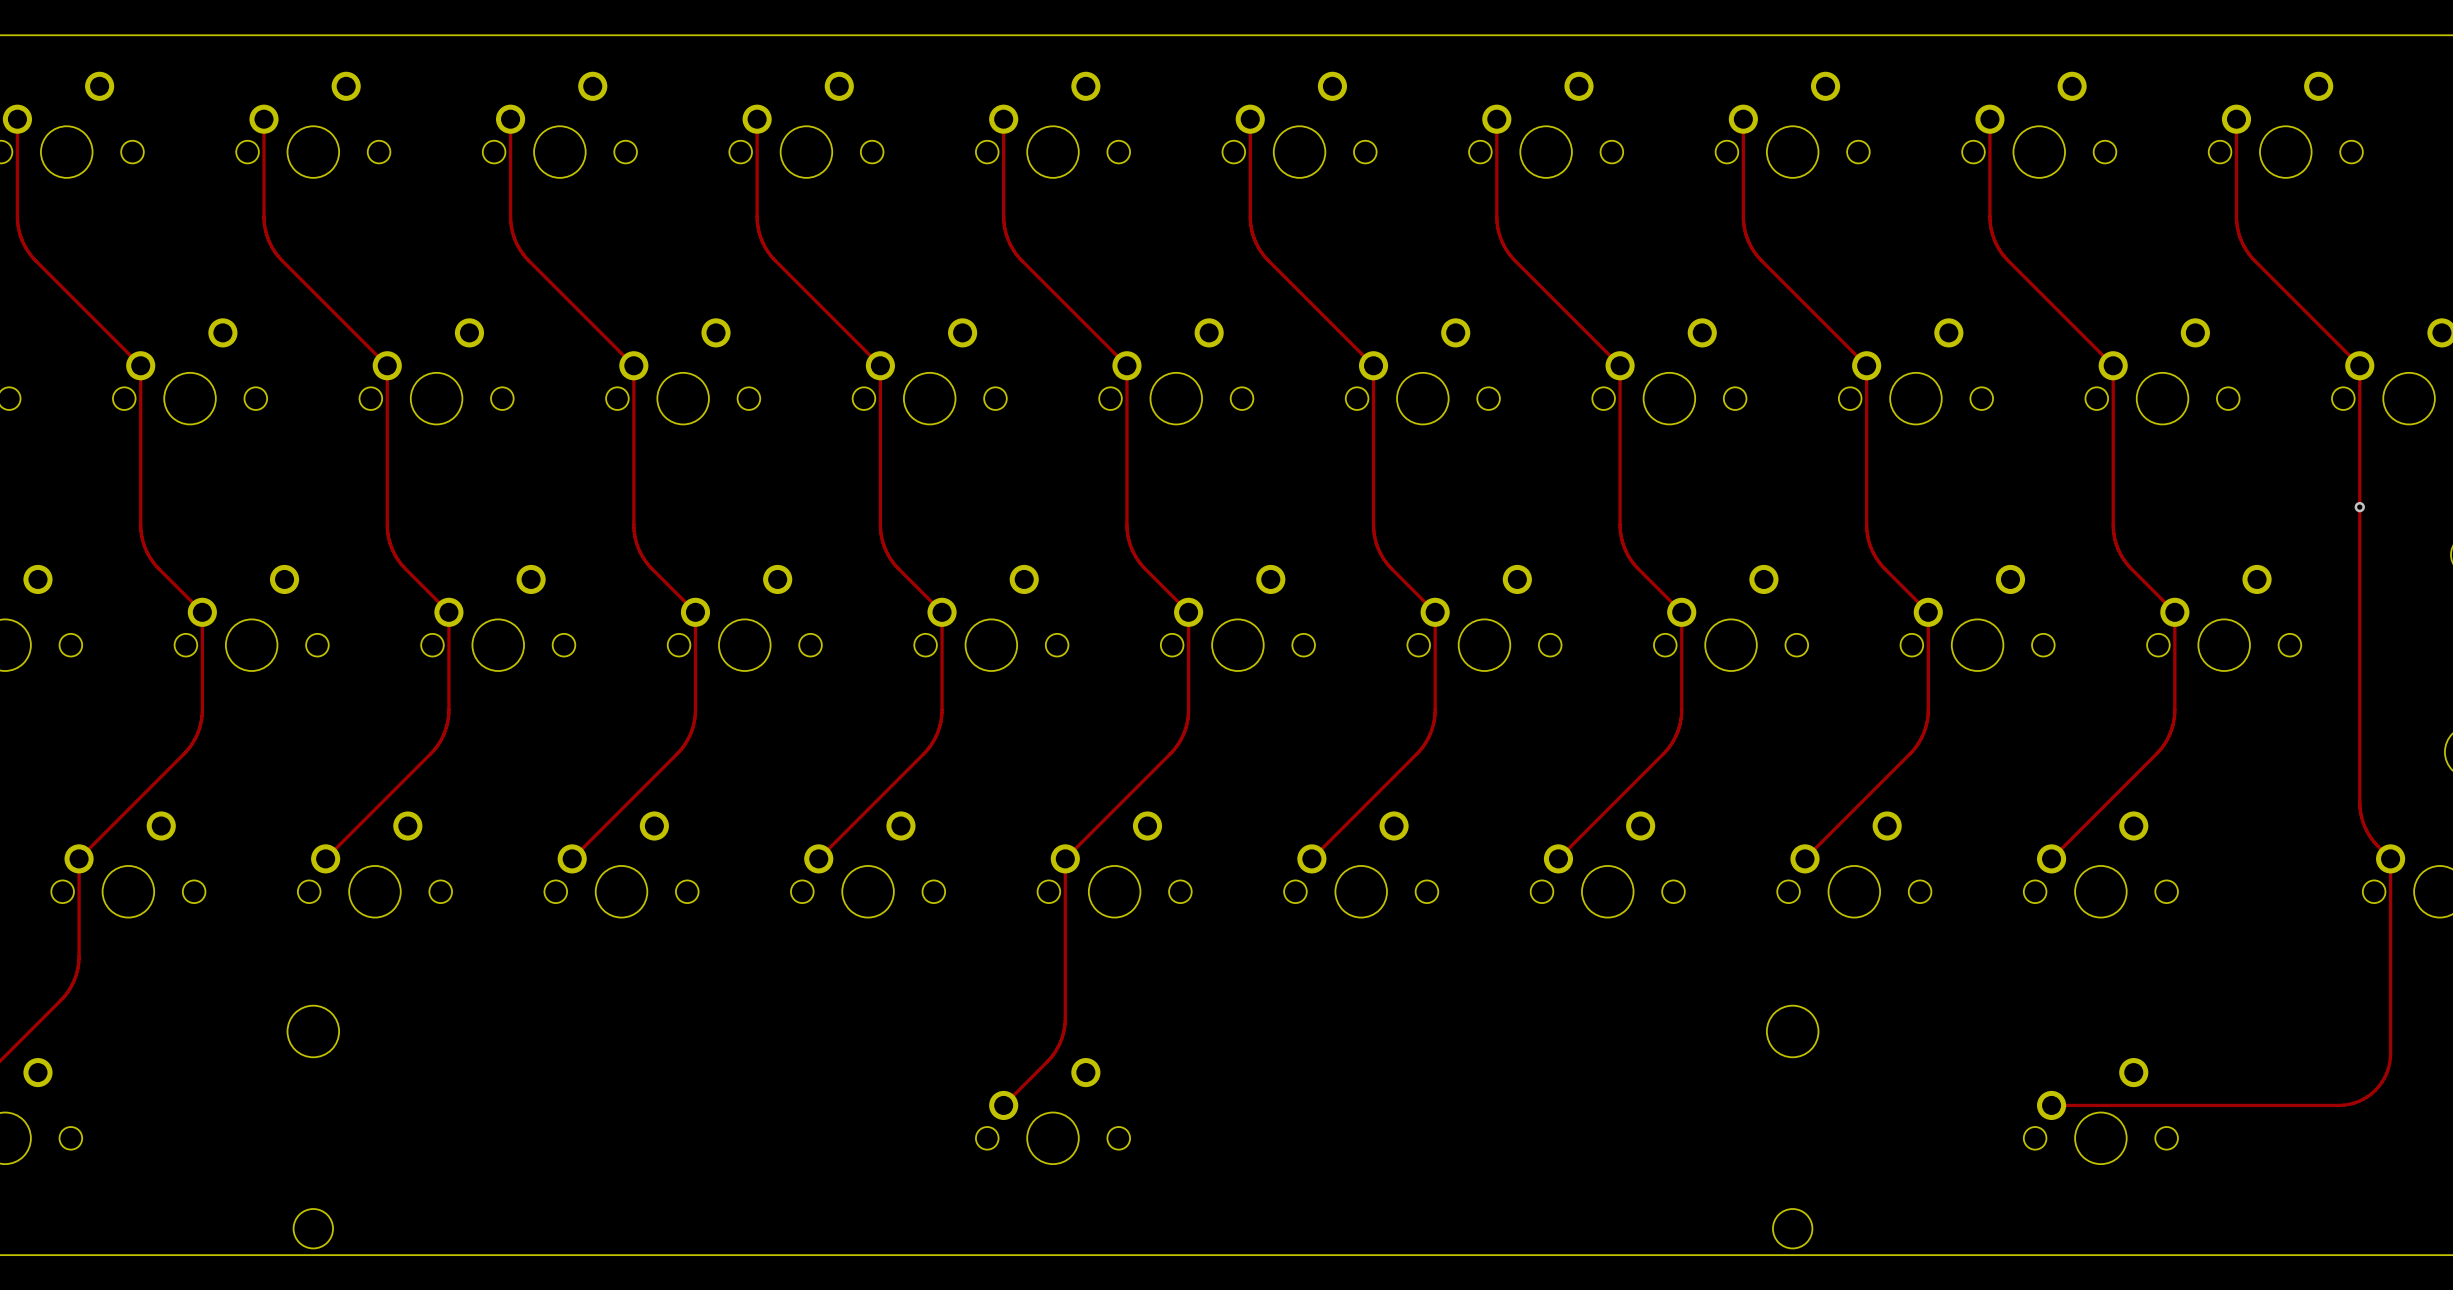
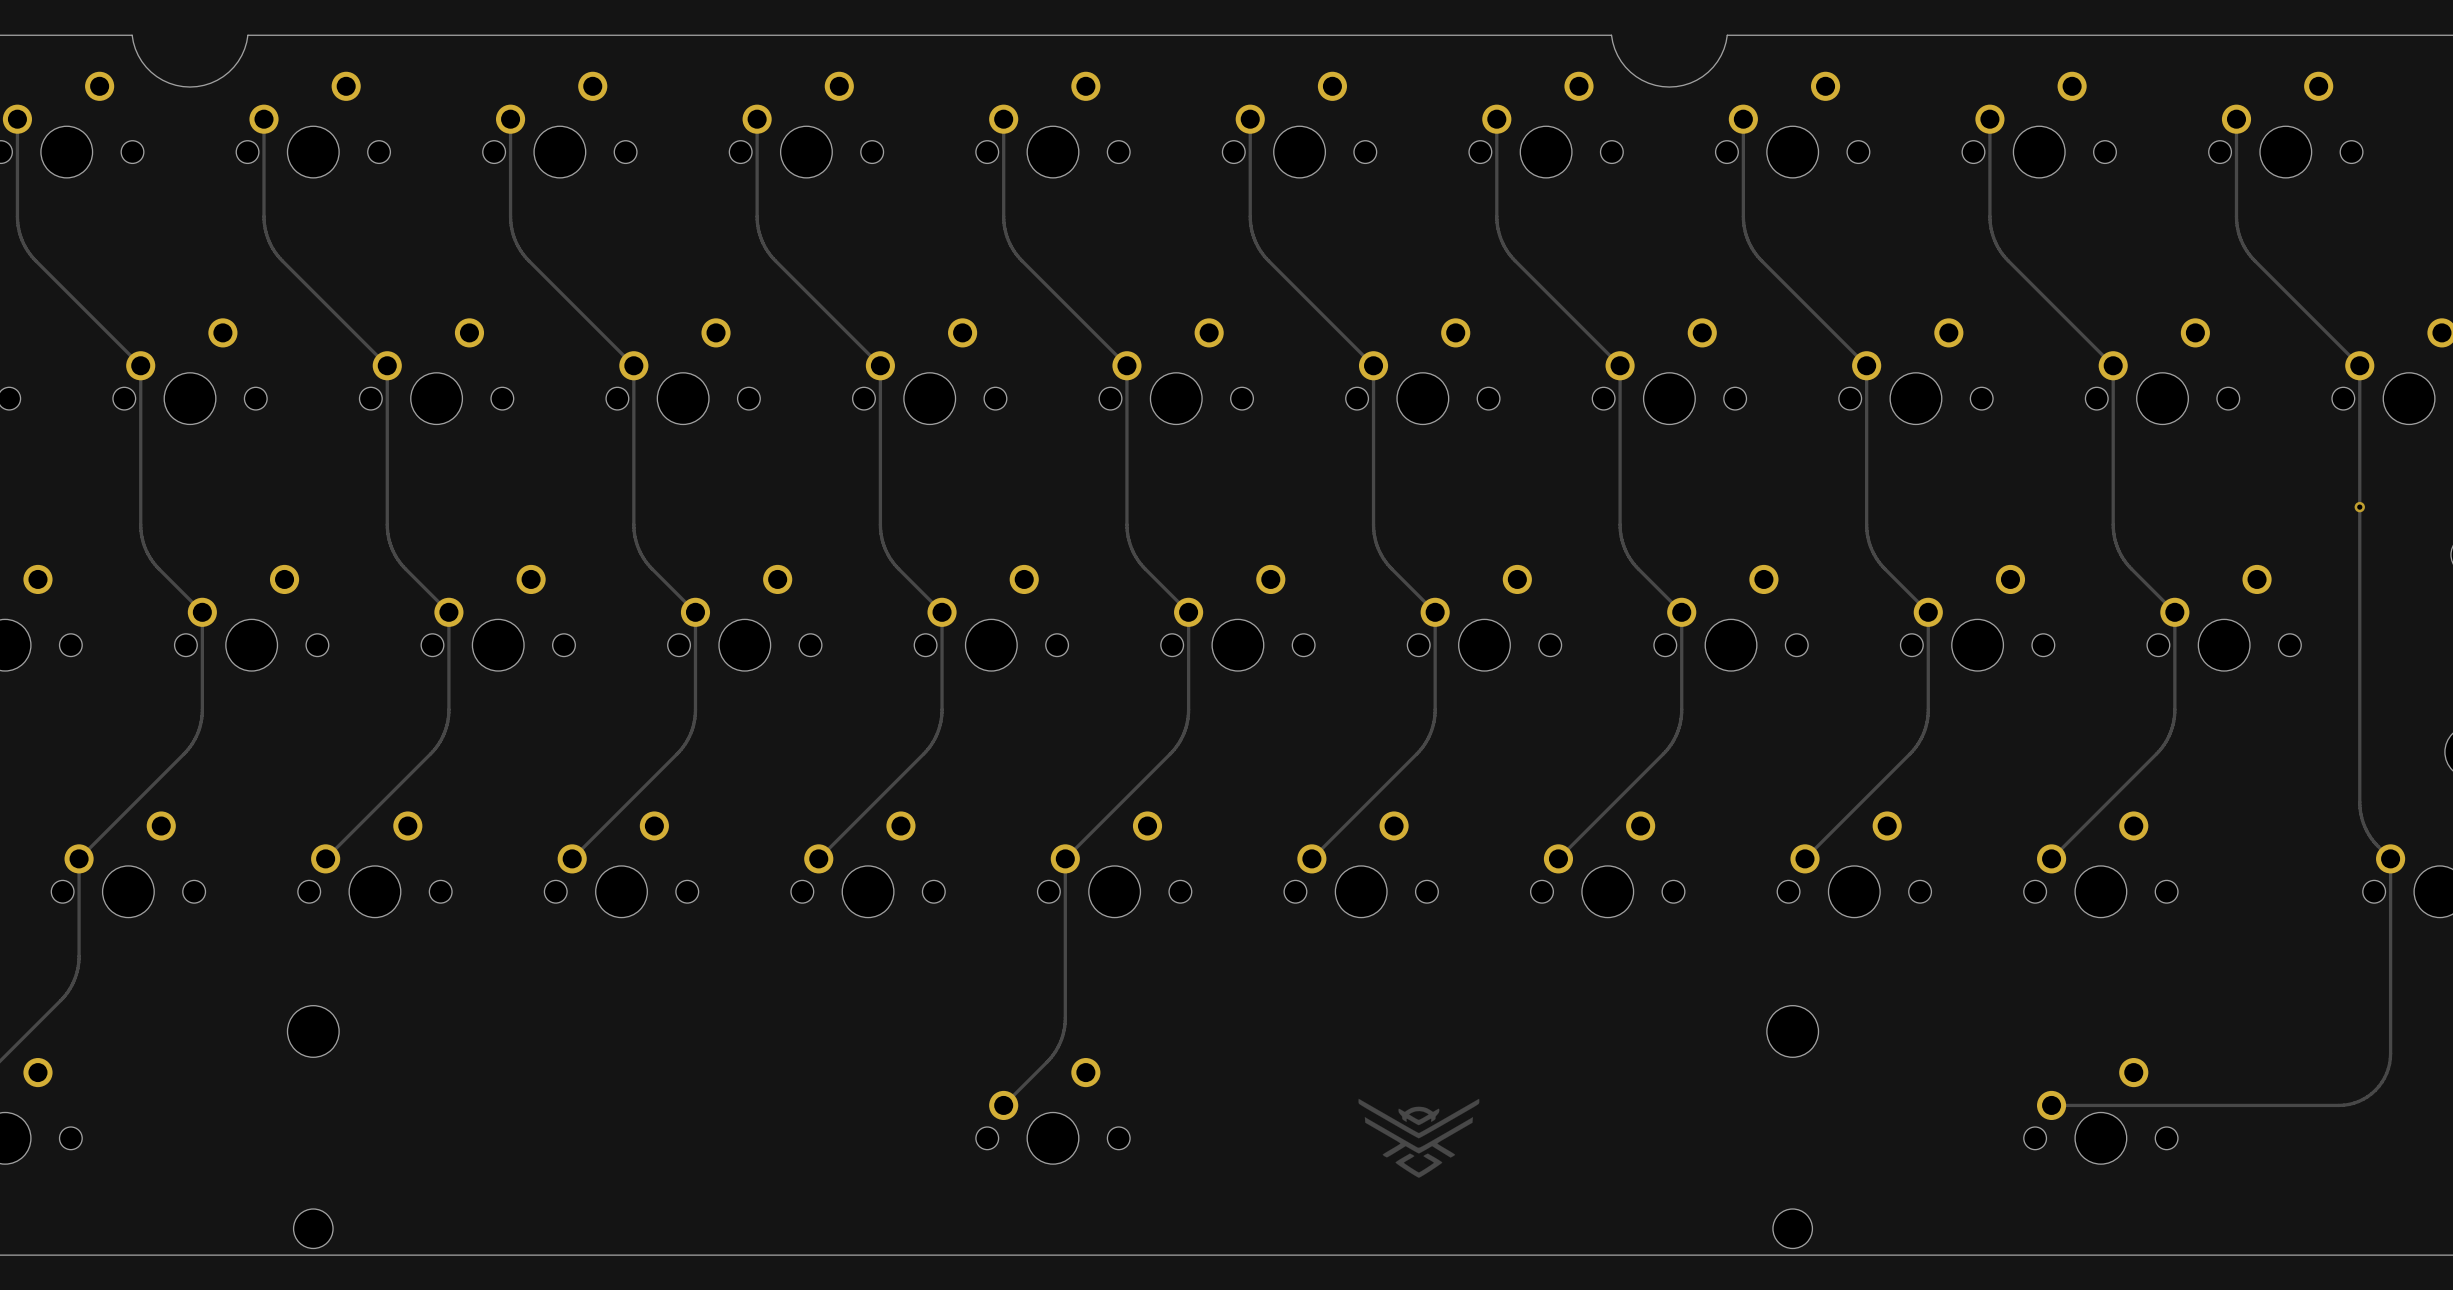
board edge: (132, 35) (247, 35) -> (132, 35) (138, 55) (151, 72) (169, 83) (190, 87) (210, 83) (228, 72) (241, 55) (247, 35)
board edge: (1611, 35) (1727, 35) -> (1611, 35) (1617, 55) (1630, 72) (1648, 83) (1669, 87) (1690, 83) (1708, 72) (1721, 55) (1727, 35)
drawing: none -> [1358, 1098, 1480, 1178]

